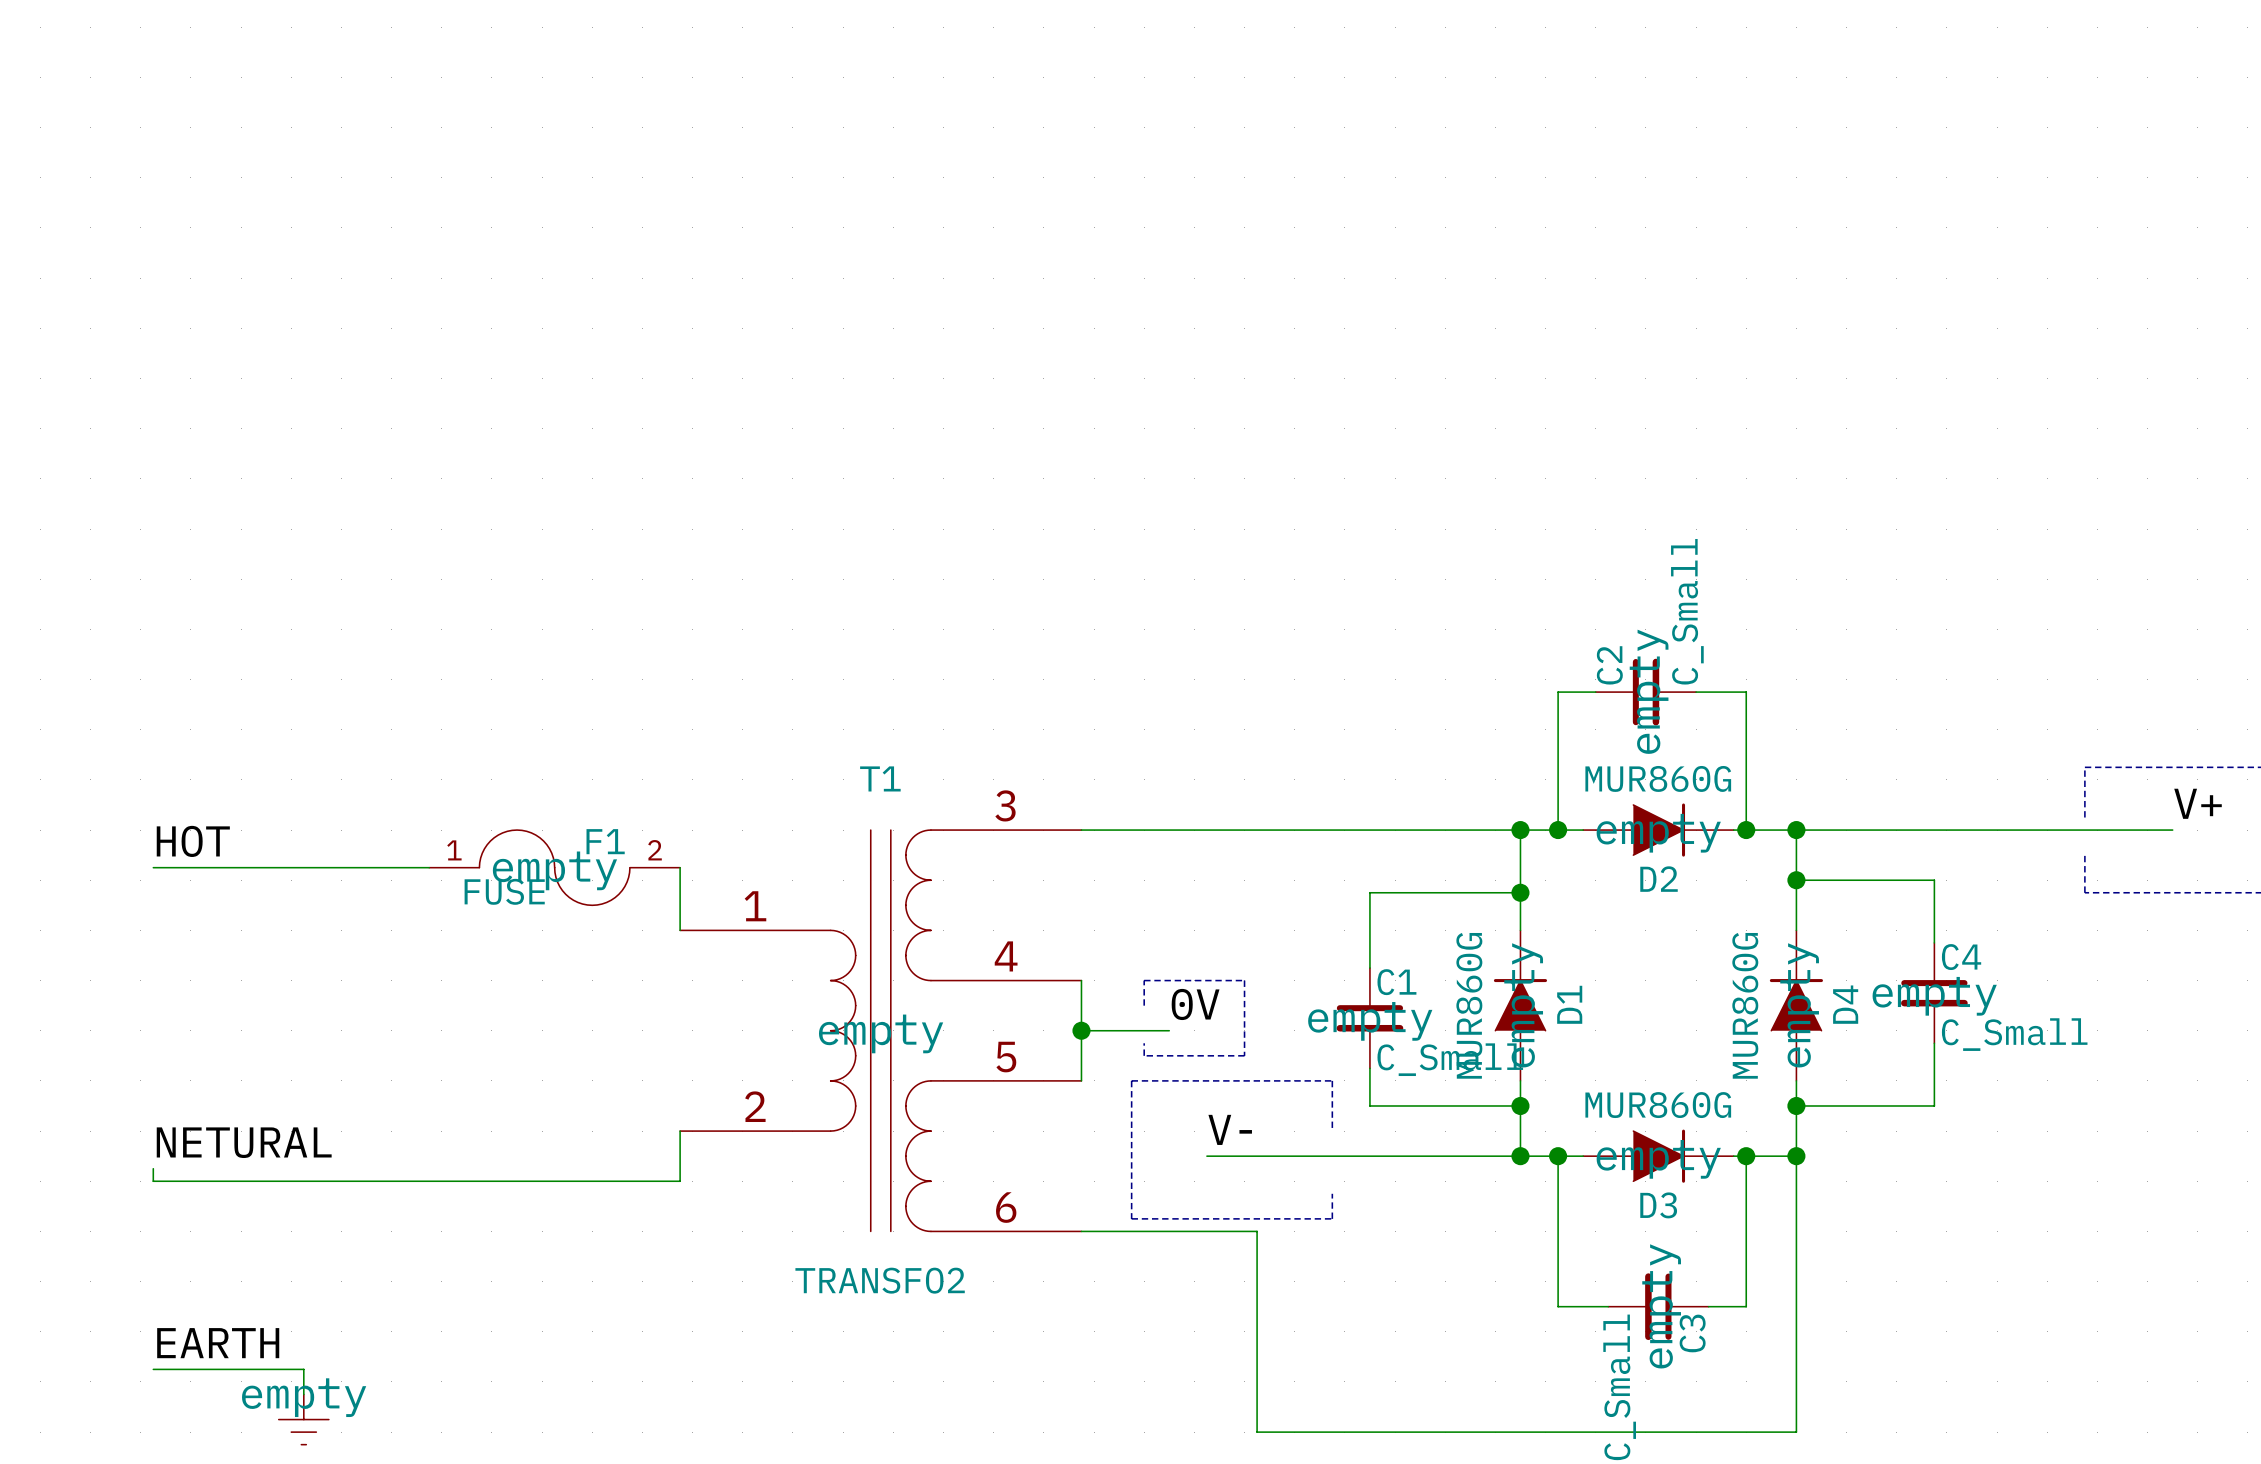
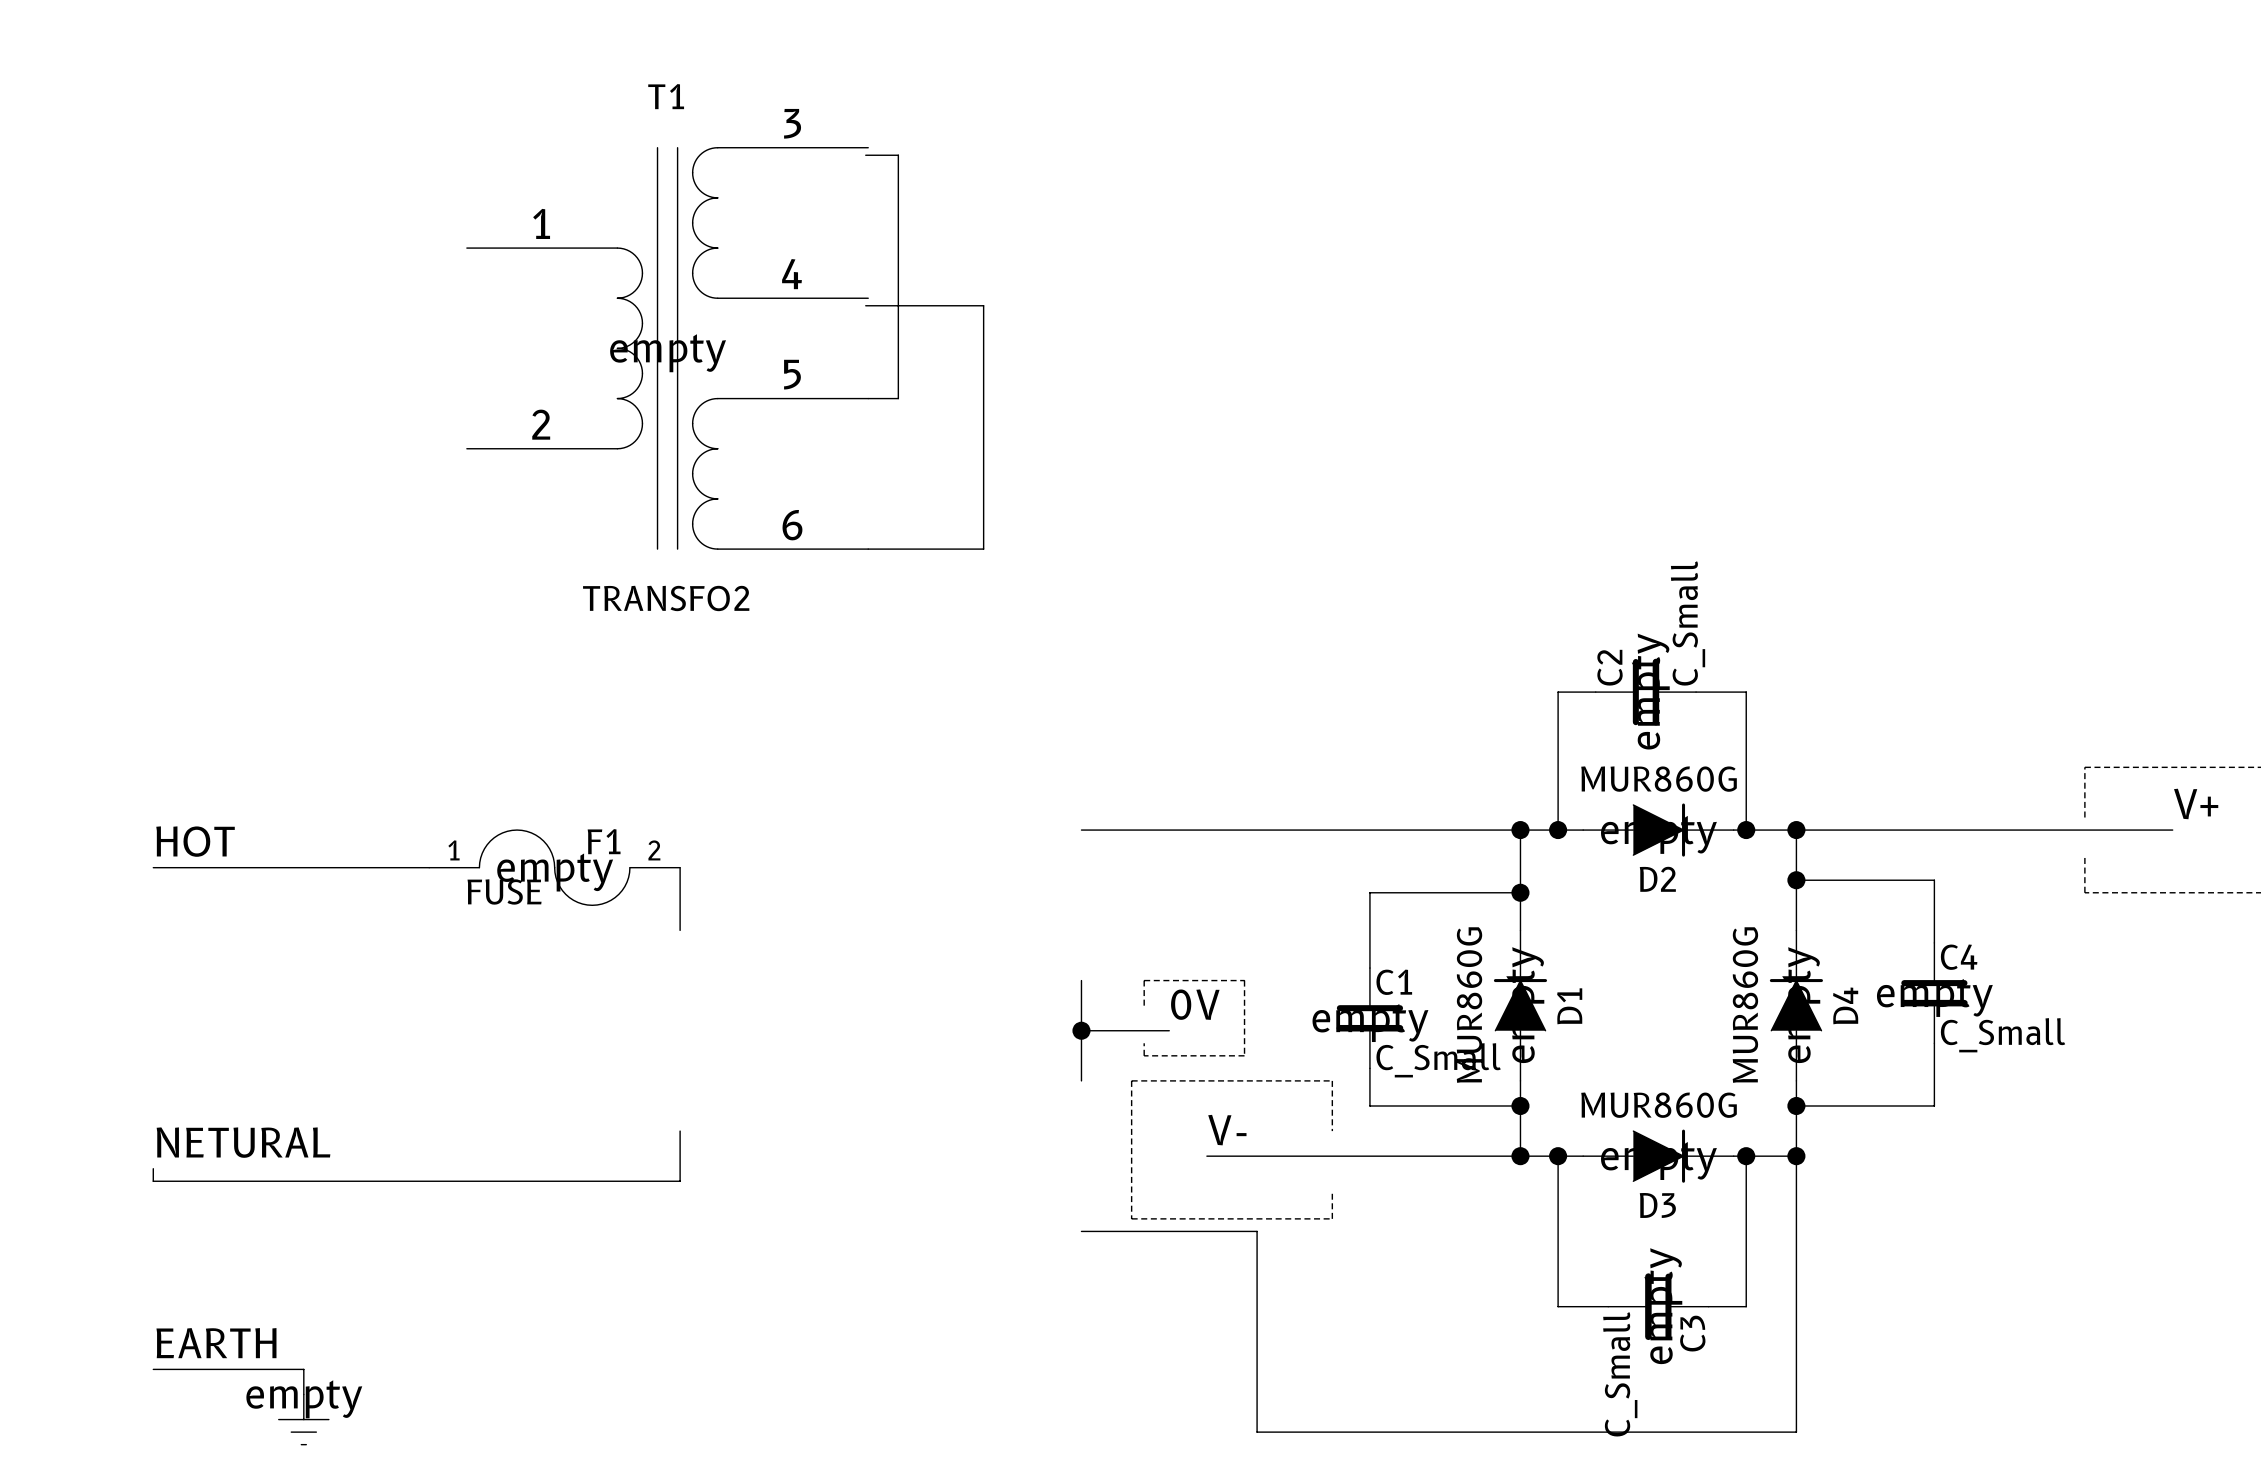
wire: none -> (865, 155) (898, 155) (898, 398) (868, 398)
wire: none -> (865, 305) (983, 305) (983, 549) (868, 549)
T1 position: (880, 1030) -> (667, 348)

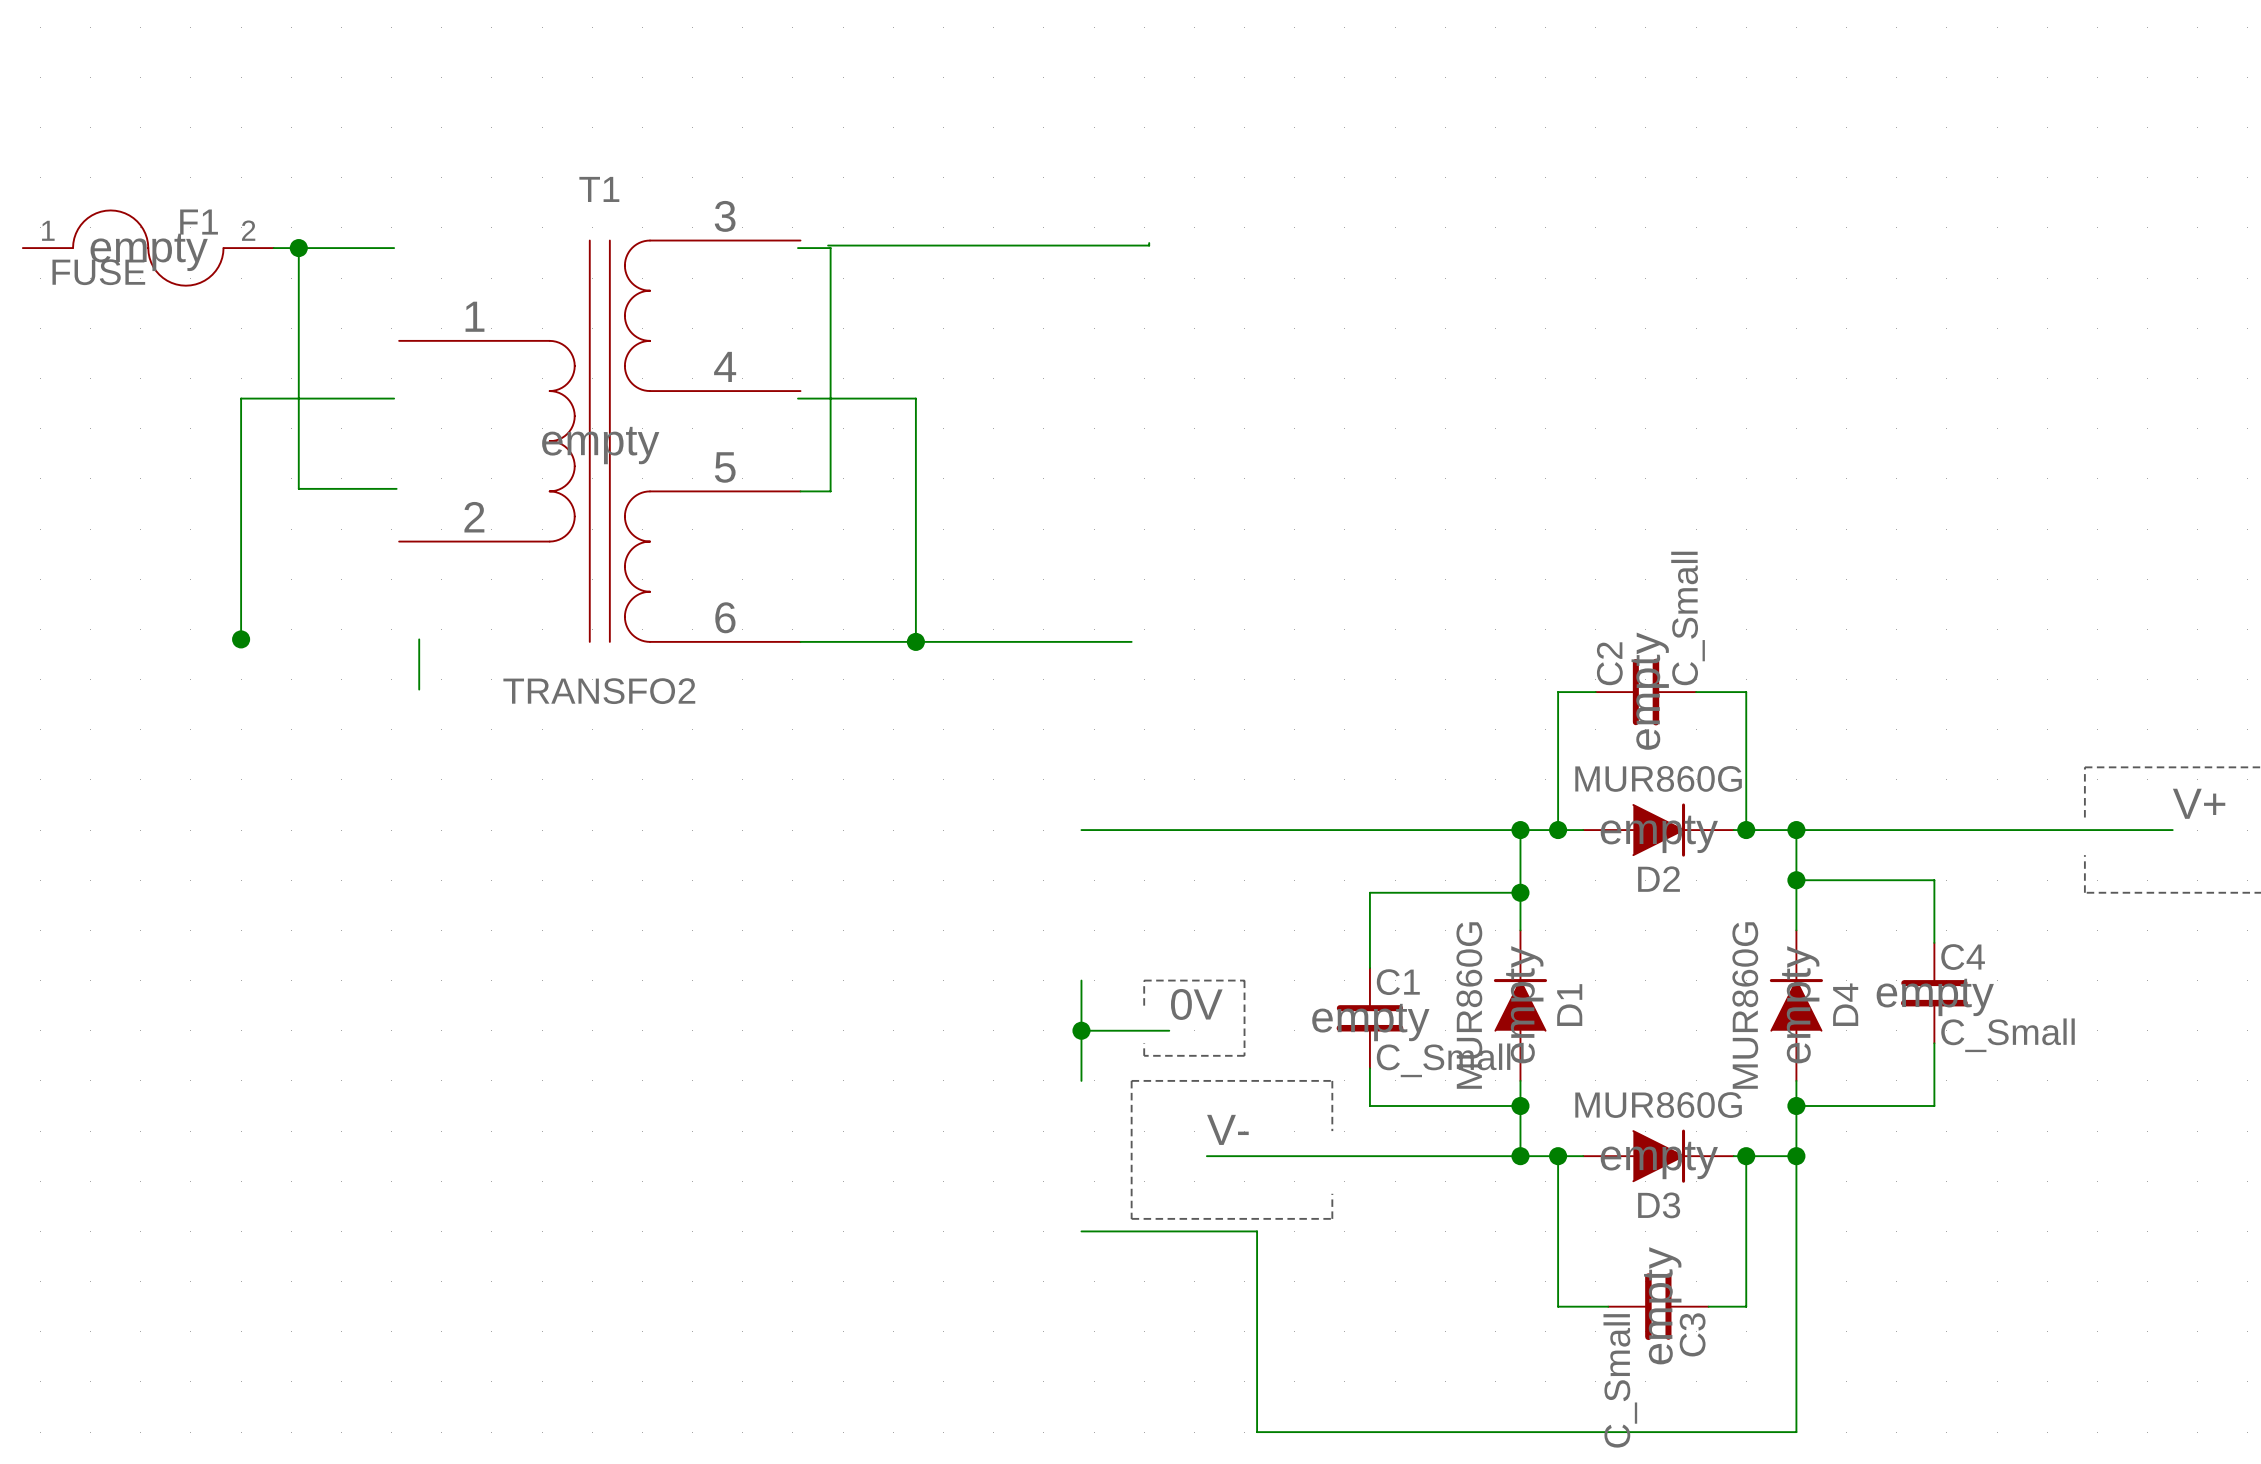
wire: (865, 155) (898, 155) (898, 398) -> (915, 641) (915, 398) (898, 398)
wire: none -> (1149, 243) (1149, 245) (828, 245)
wire: none -> (273, 248) (394, 248)
wire: none -> (298, 248) (298, 488) (396, 488)
junction: none -> (298, 248)
wire: none -> (798, 248) (830, 248) (830, 491) (800, 491)
wire: (865, 305) (983, 305) (983, 549) (868, 549) -> none
T1 position: (667, 348) -> (599, 441)
wire: none -> (394, 398) (241, 398) (241, 639)
junction: none -> (241, 639)
wire: none -> (419, 639) (419, 689)
wire: none -> (800, 641) (1131, 641)
junction: none -> (915, 641)
label: HOT (195, 841) -> none
wire: (153, 867) (429, 867) -> none
F1 position: (554, 867) -> (148, 248)
wire: (680, 867) (680, 930) -> none
wire: (680, 1131) (680, 1181) (153, 1181) (153, 1168) -> none
label: NETURAL (243, 1142) -> none
label: EARTH (216, 1343) -> none
wire: (153, 1369) (303, 1369) (303, 1394) -> none
power symbol: (303, 1419) -> none

